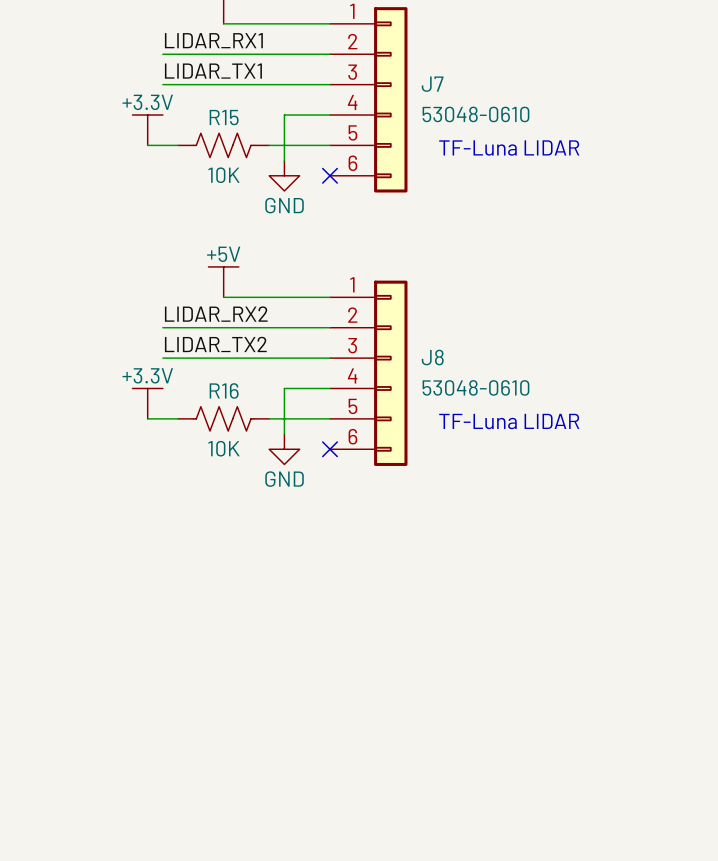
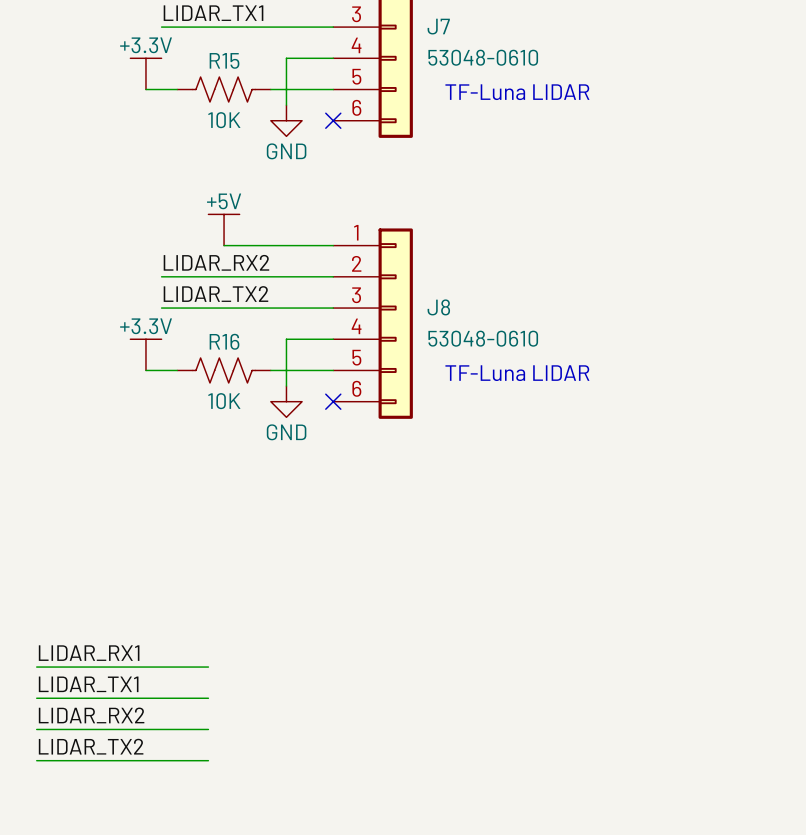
label: none -> LIDAR_RX1 (89, 653)
wire: none -> (36, 667) (208, 667)
label: none -> LIDAR_TX1 (88, 684)
wire: none -> (36, 698) (208, 698)
label: none -> LIDAR_RX2 (91, 715)
wire: none -> (36, 729) (208, 729)
label: none -> LIDAR_TX2 (91, 746)
wire: none -> (36, 760) (208, 760)

